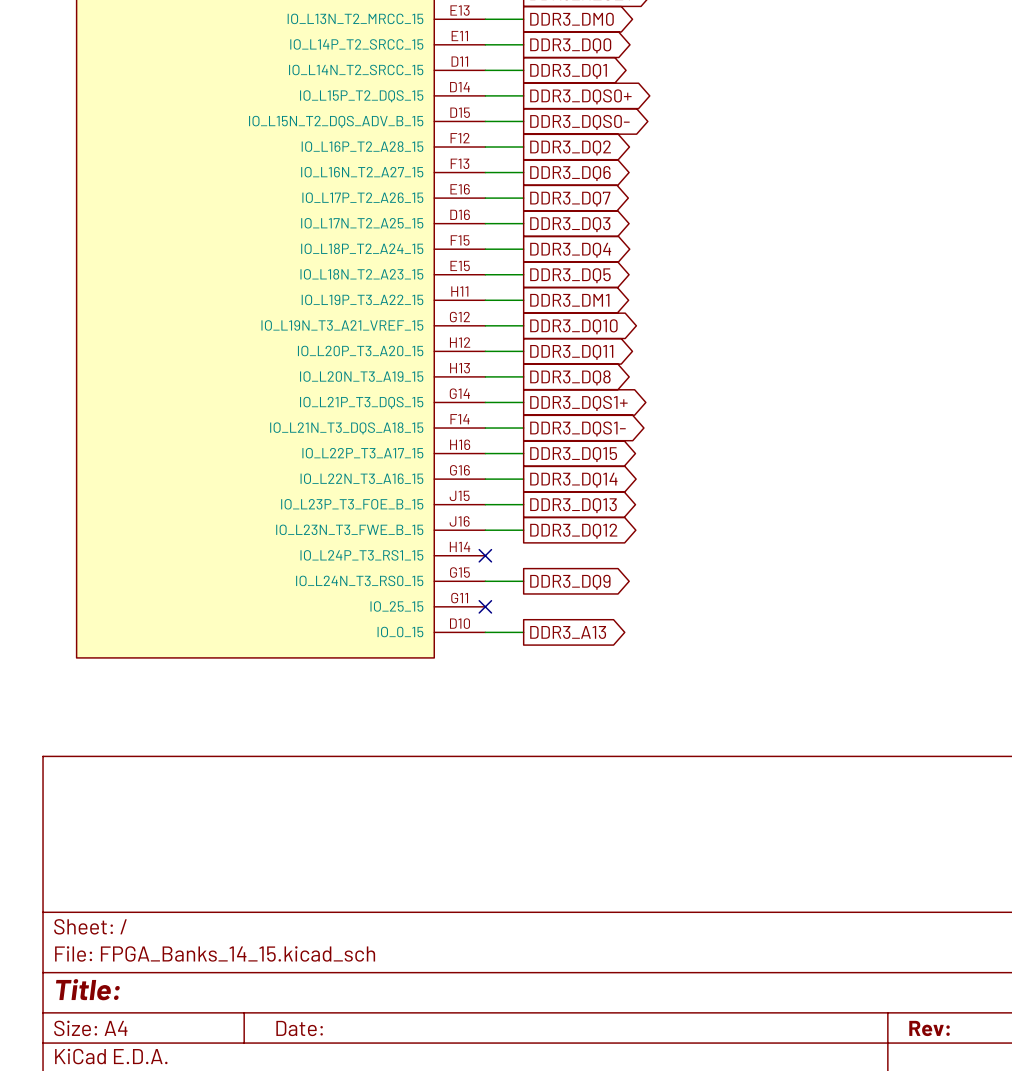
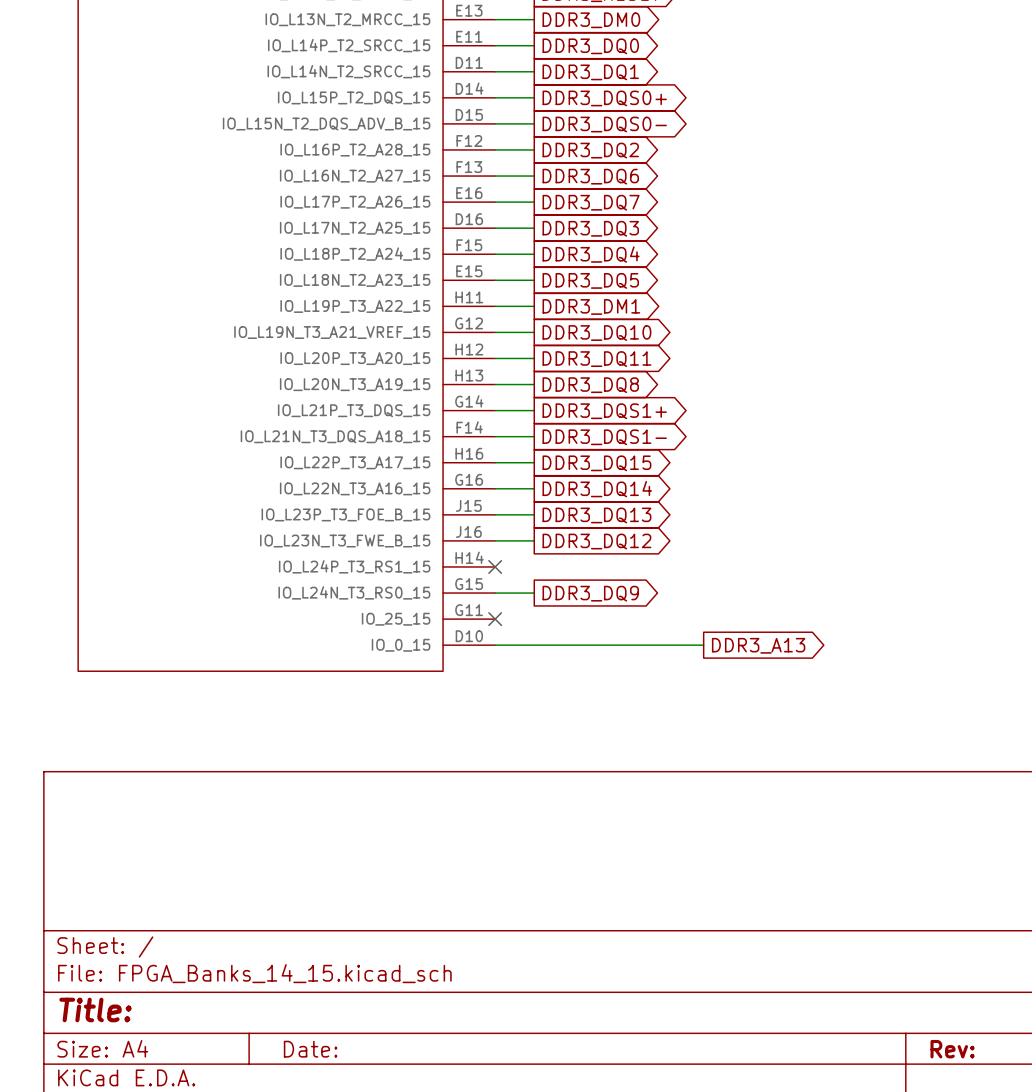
wire: none -> (534, 645) (703, 645)
global label position: DDR3_A13 (568, 632) -> DDR3_A13 (758, 645)

